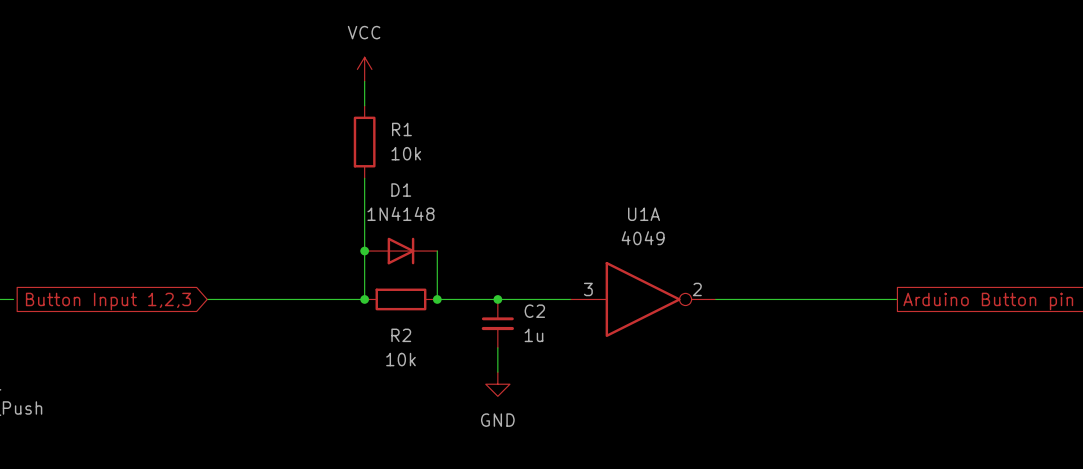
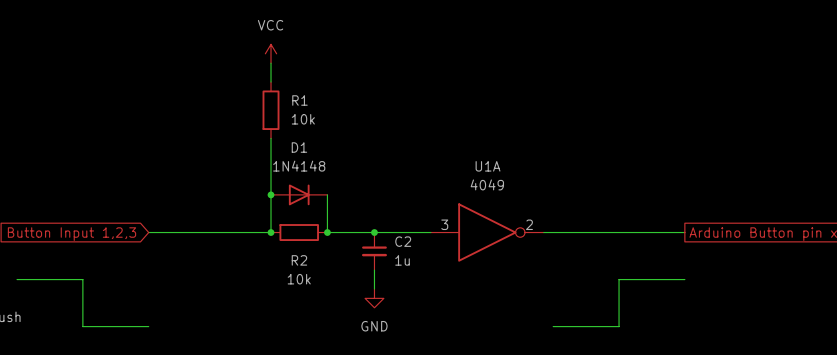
wire: none -> (17, 279) (82, 279) (82, 326) (148, 326)
wire: none -> (684, 279) (619, 279) (619, 326) (553, 326)

